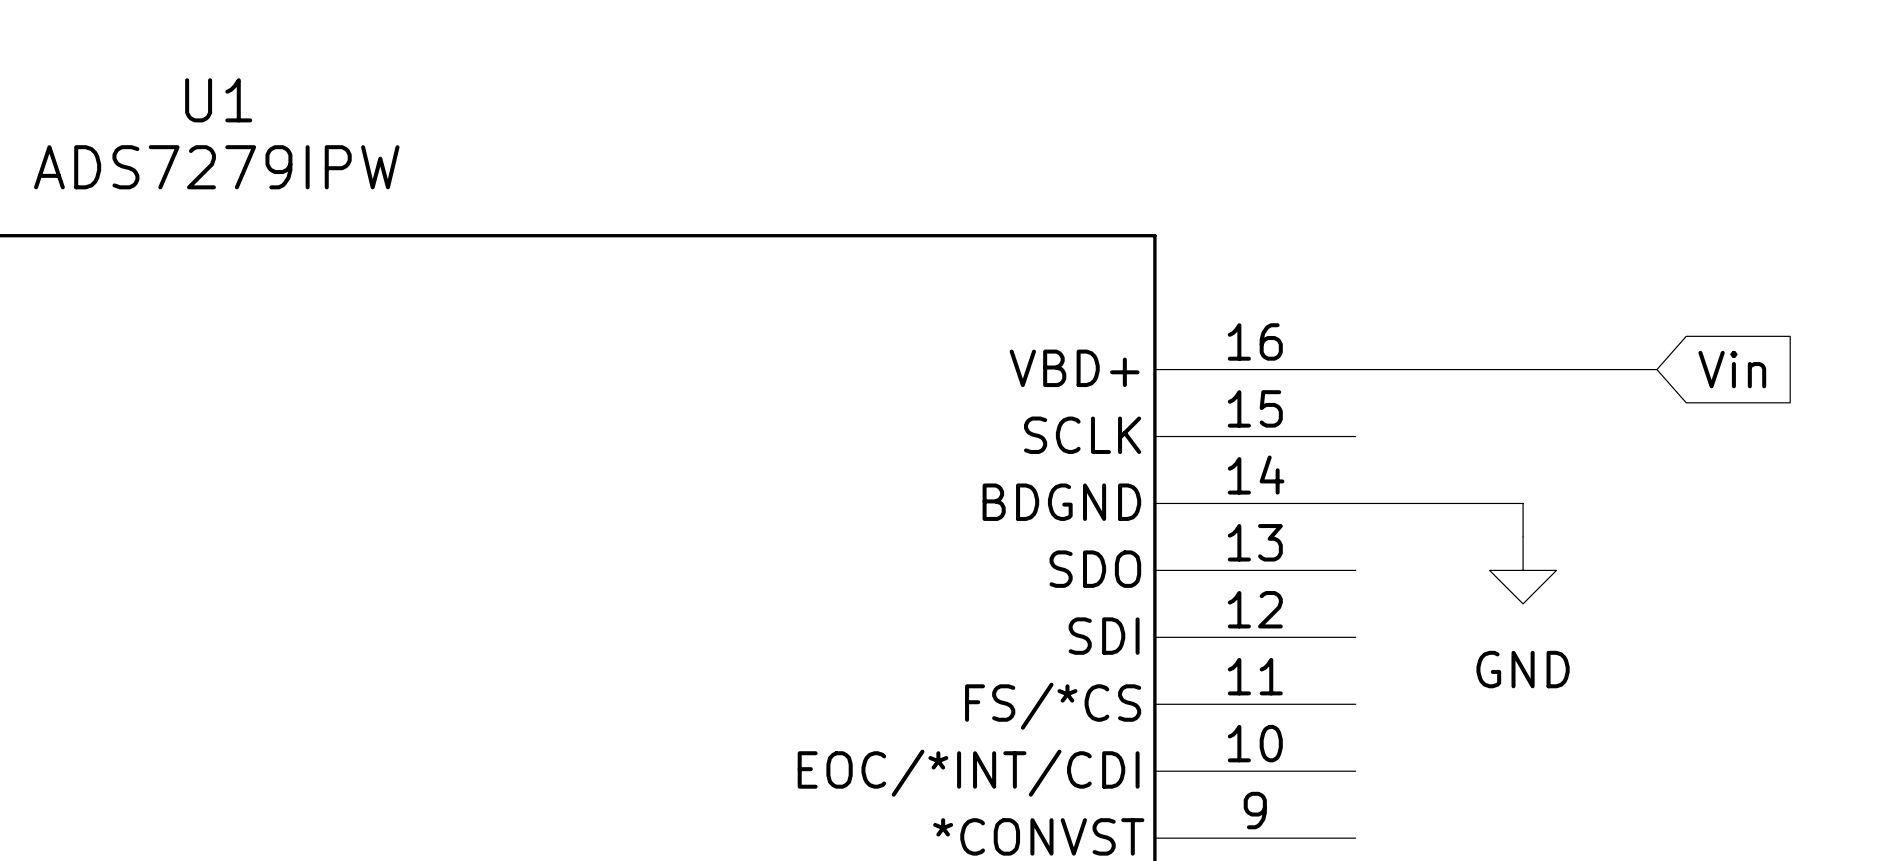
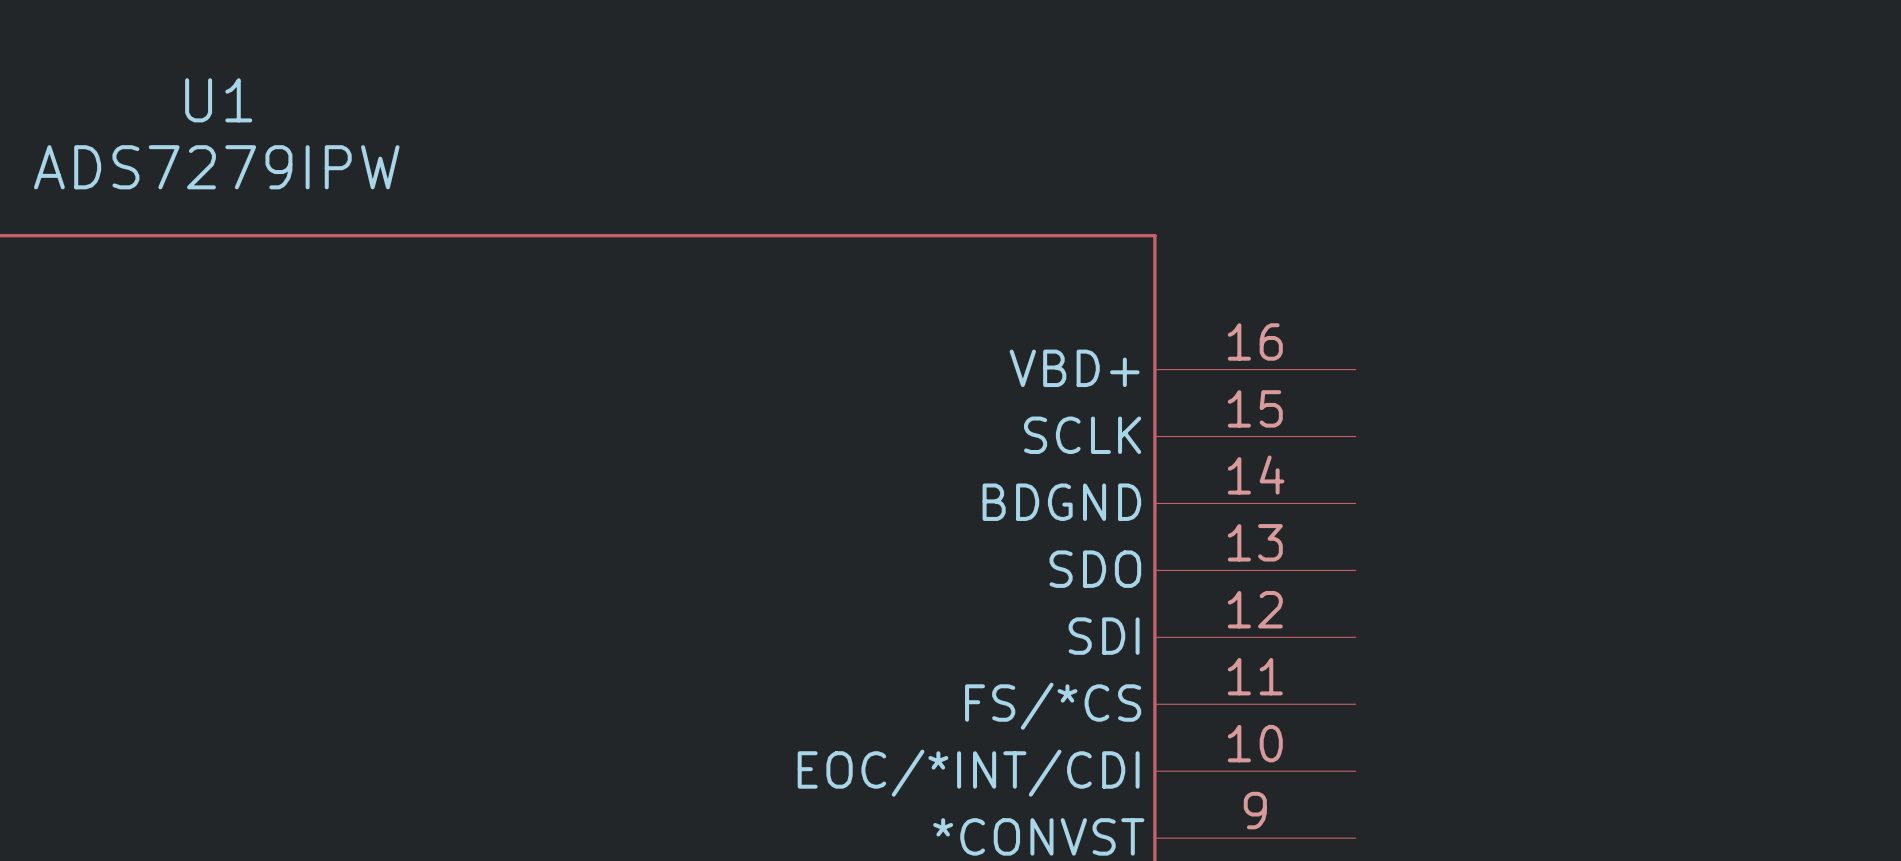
wire: (1355, 369) (1656, 369) -> none
global label: Vin (1732, 369) -> none
wire: (1355, 503) (1523, 503) (1523, 536) -> none
power symbol: GND (1523, 570) -> none

